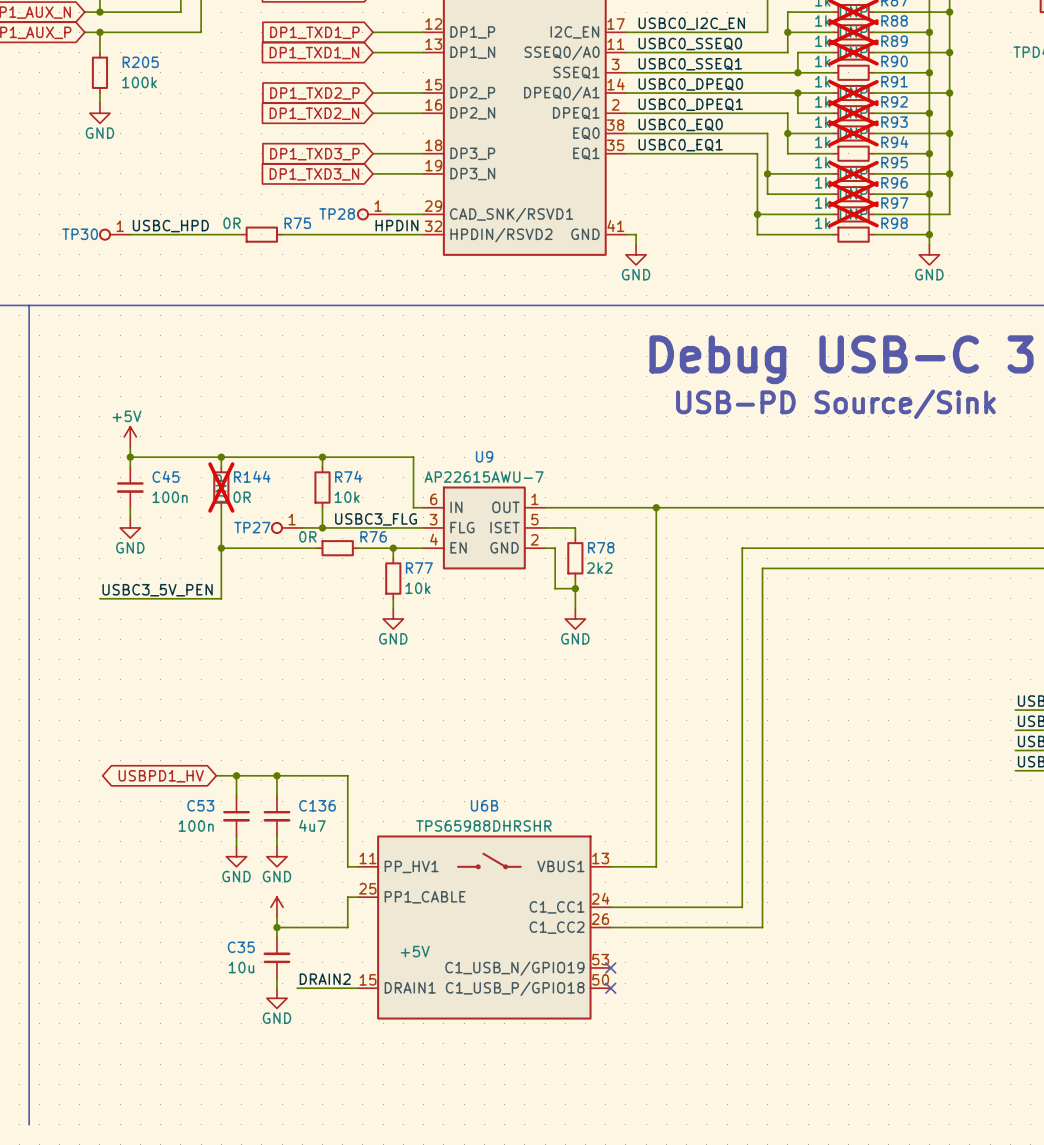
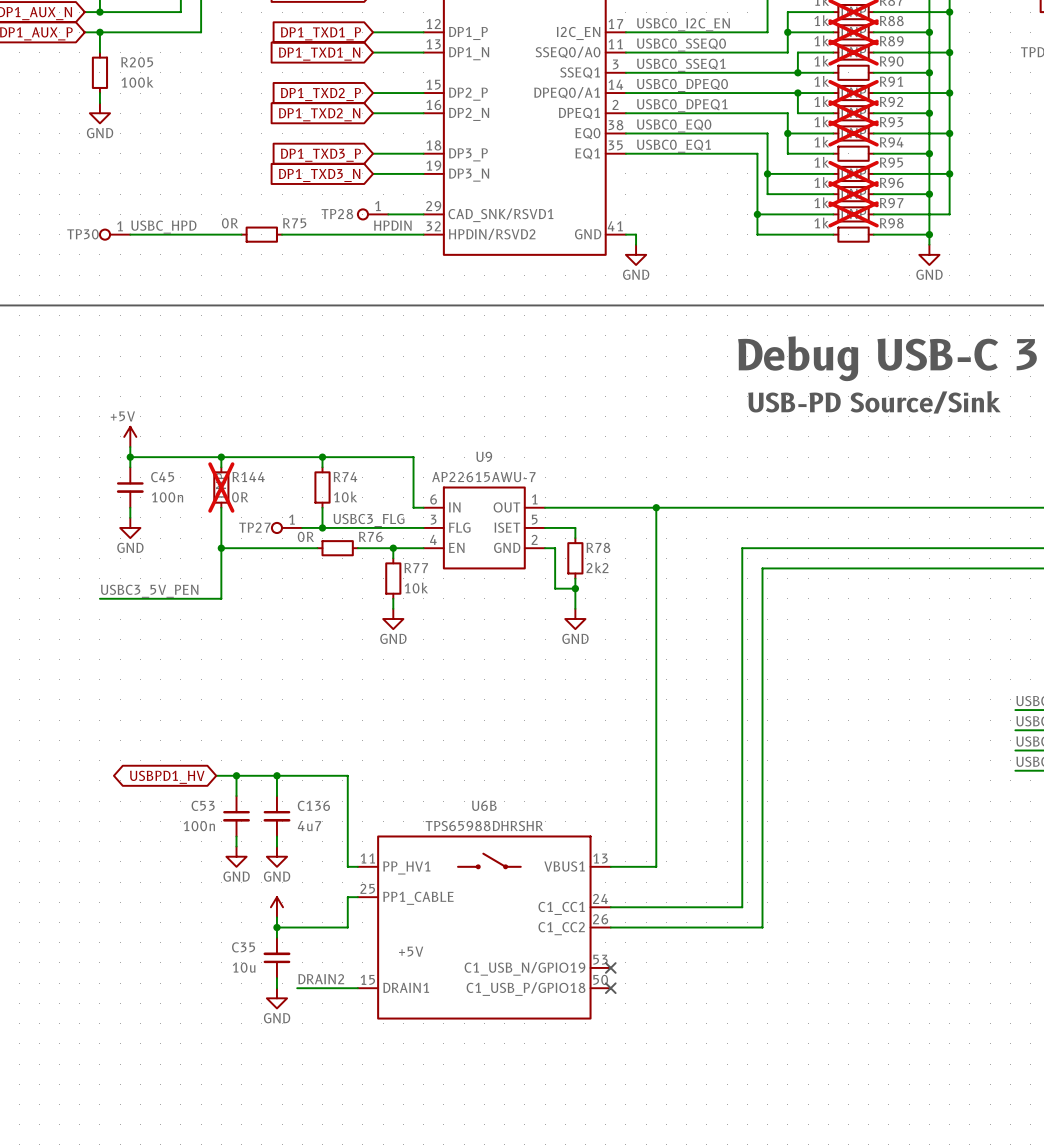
line: (29, 305) (29, 1124) -> none

